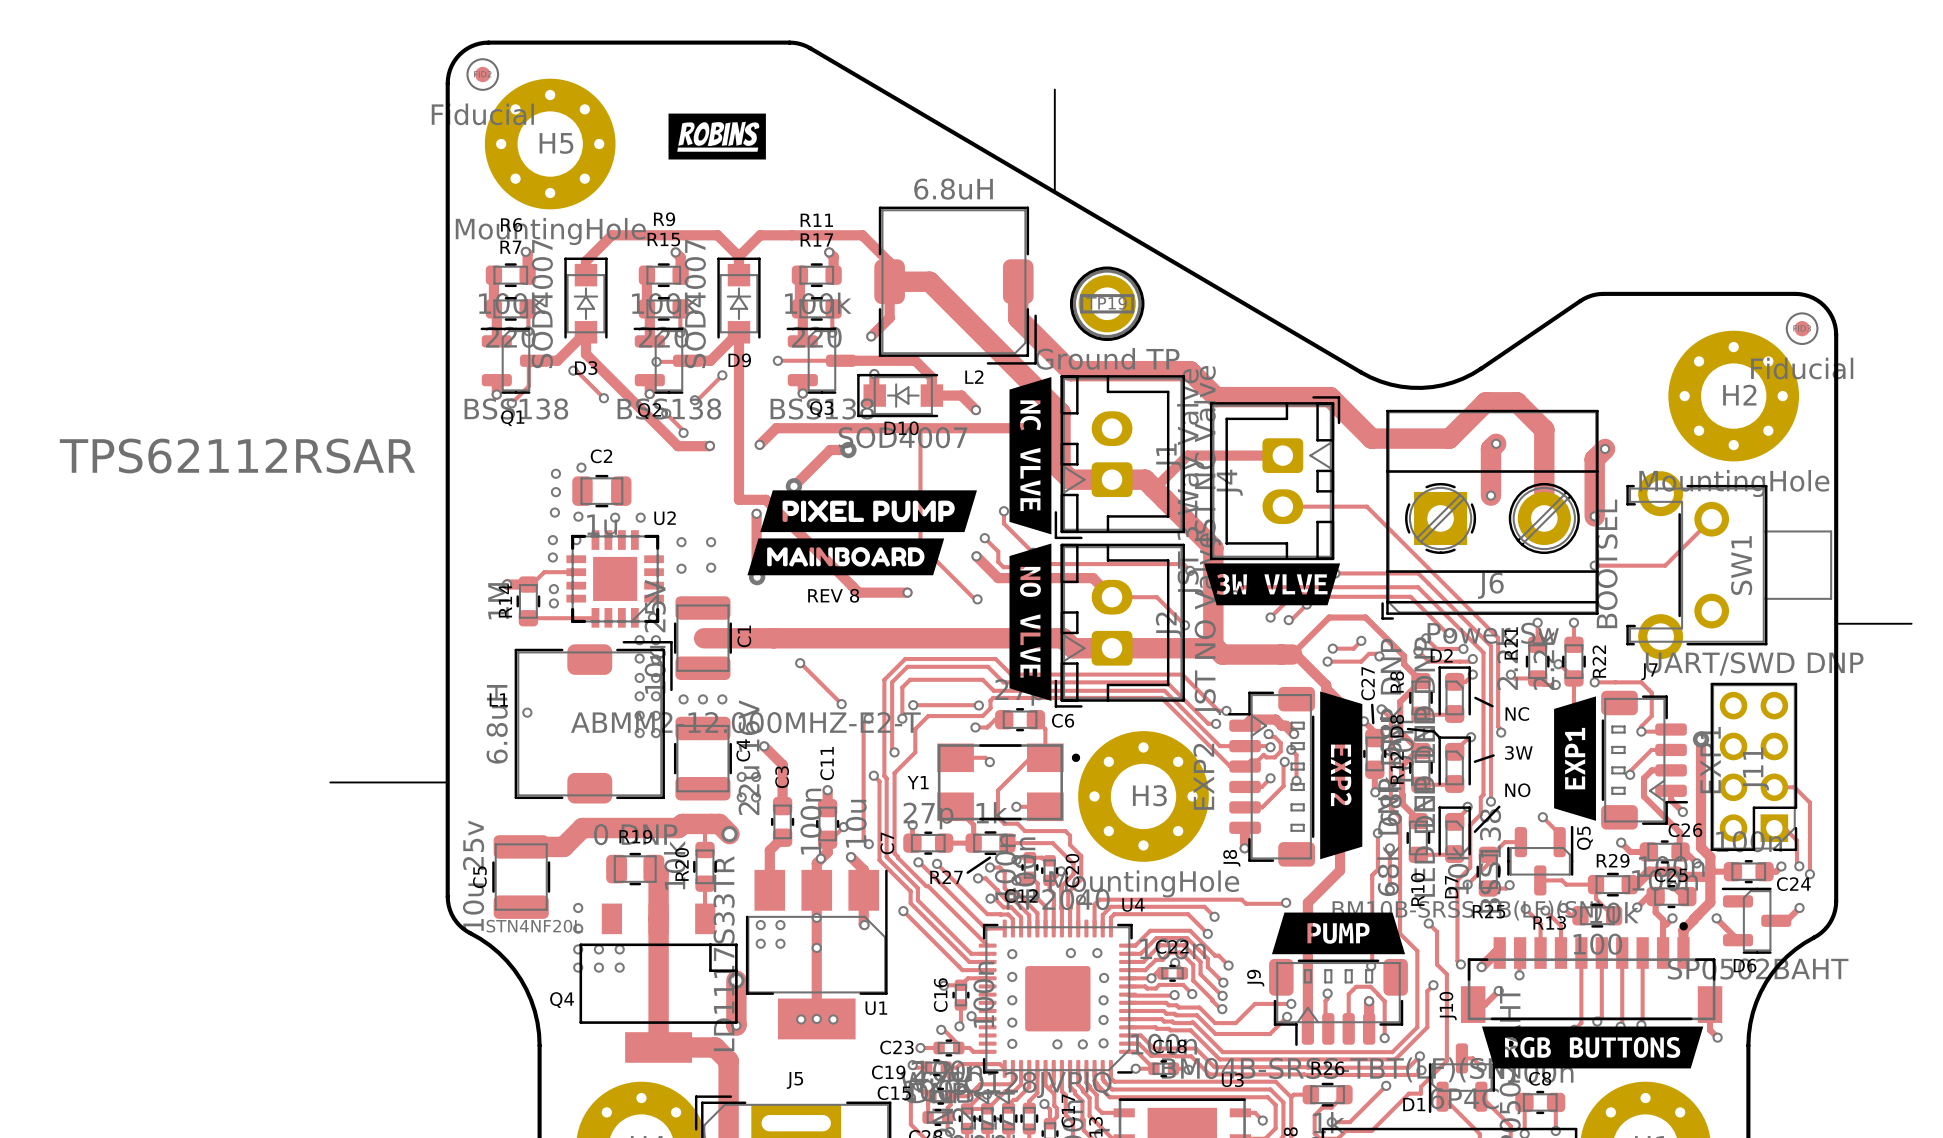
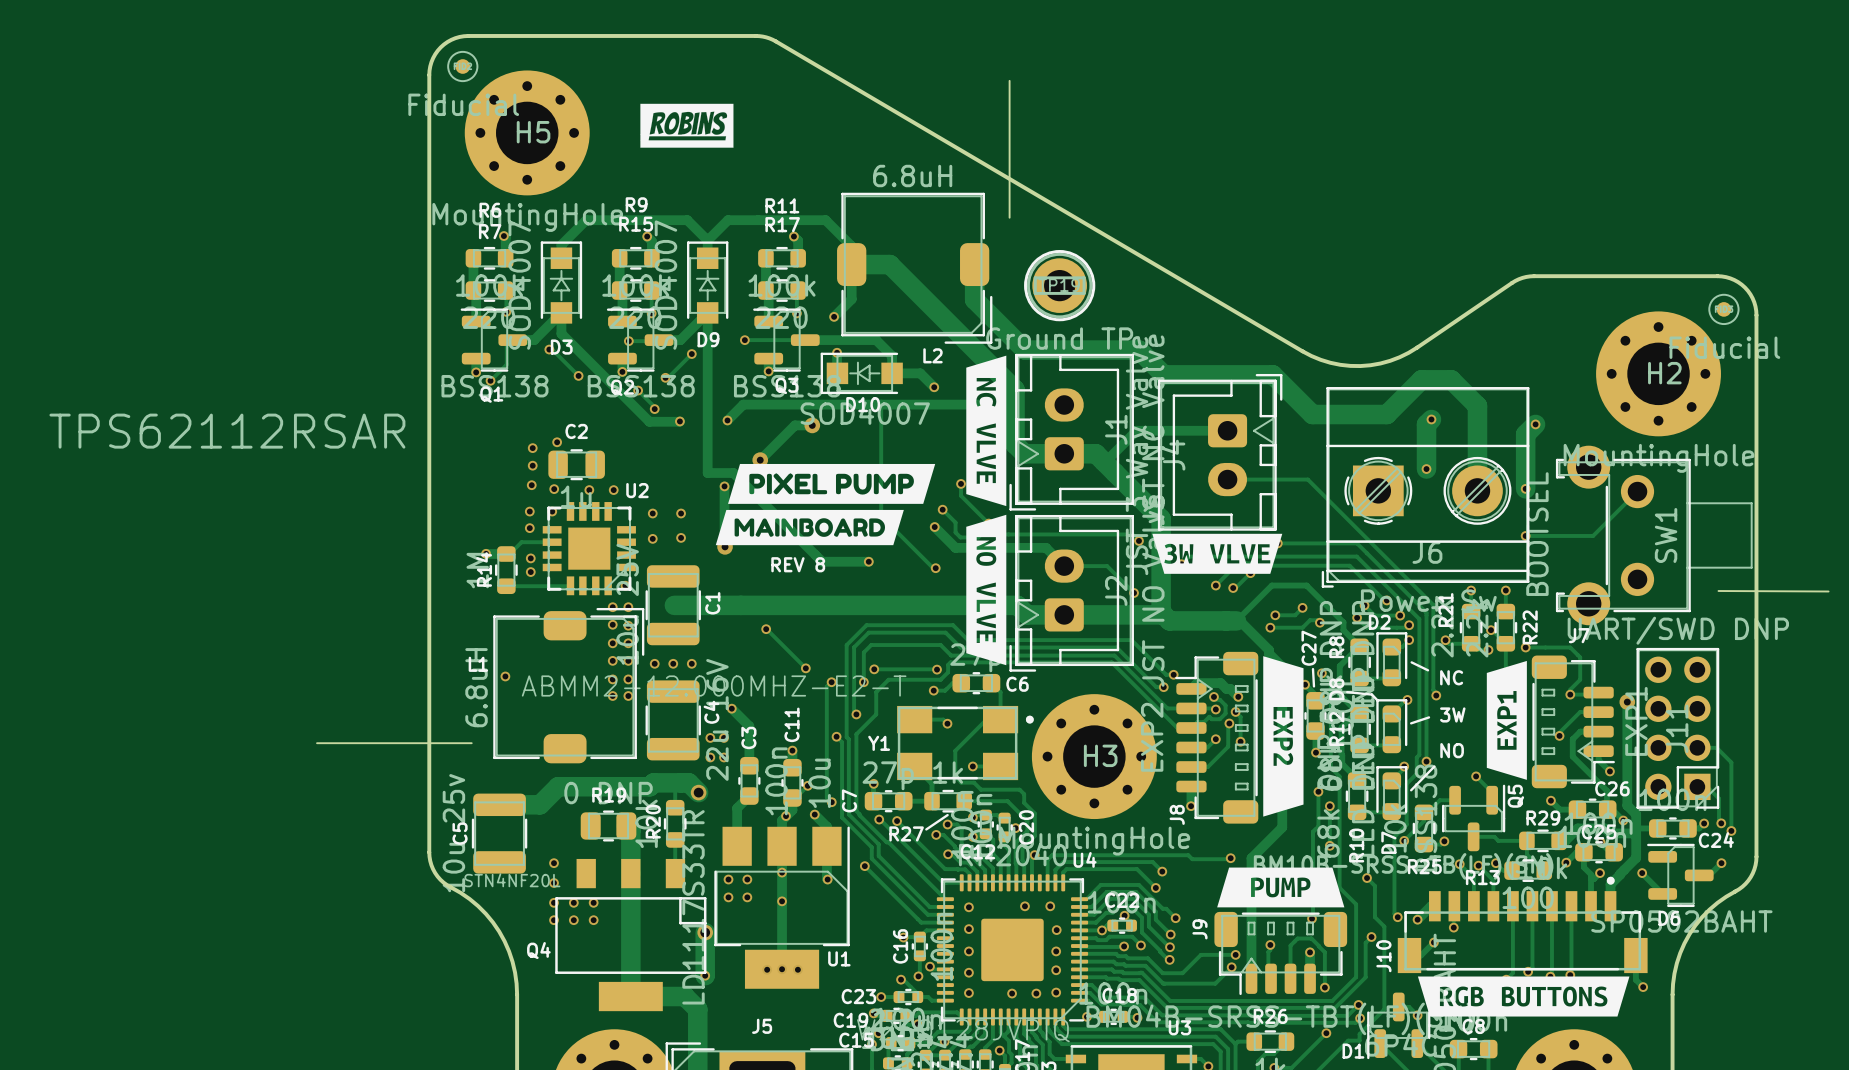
board edge: none -> (1009, 178) (1009, 217)
board edge: (1835, 623) (1911, 623) -> (1718, 591) (1828, 591)
board edge: none -> (429, 743) (471, 743)

